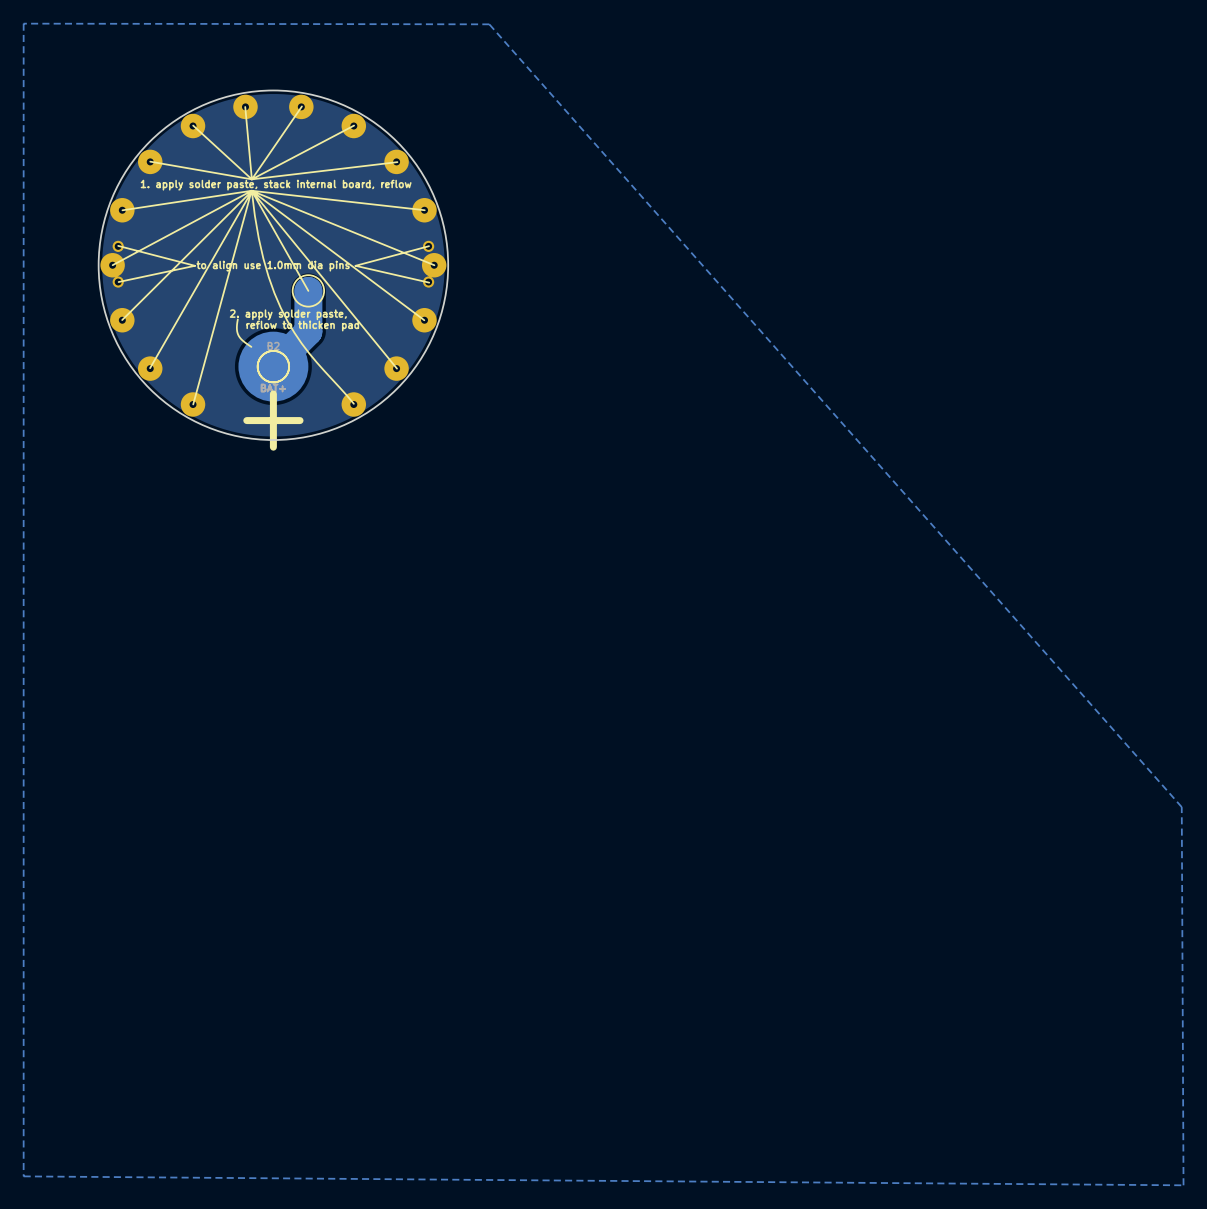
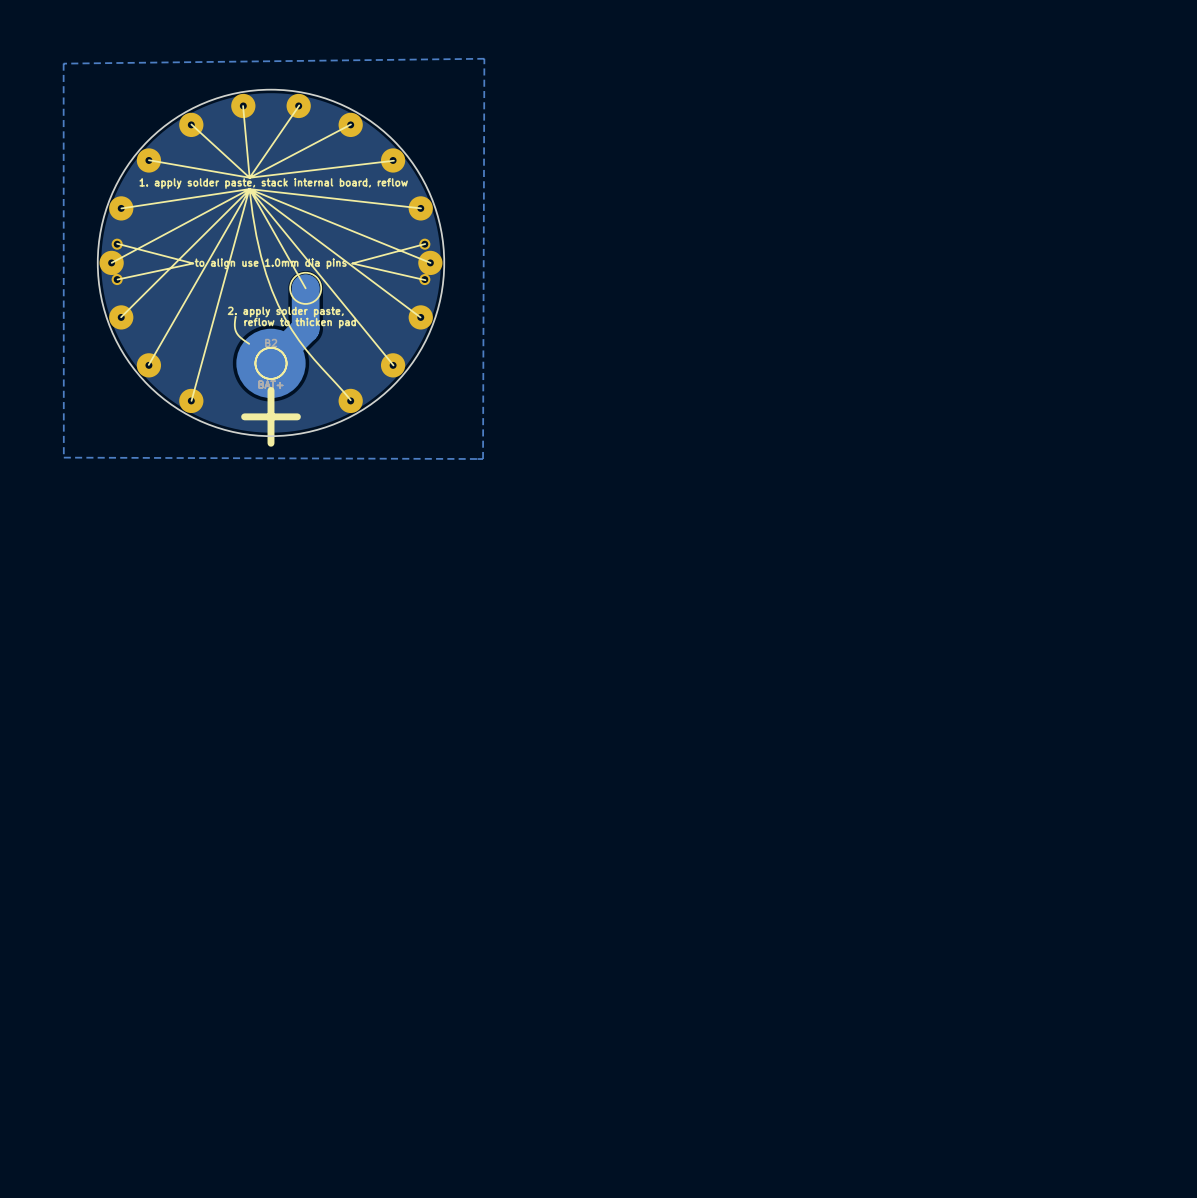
zone outline: (23, 23) (489, 24) (1181, 807) (1183, 1185) (23, 1176) (23, 23) -> none
zone outline: none -> (484, 58) (63, 63) (63, 457) (483, 459) (484, 58)

